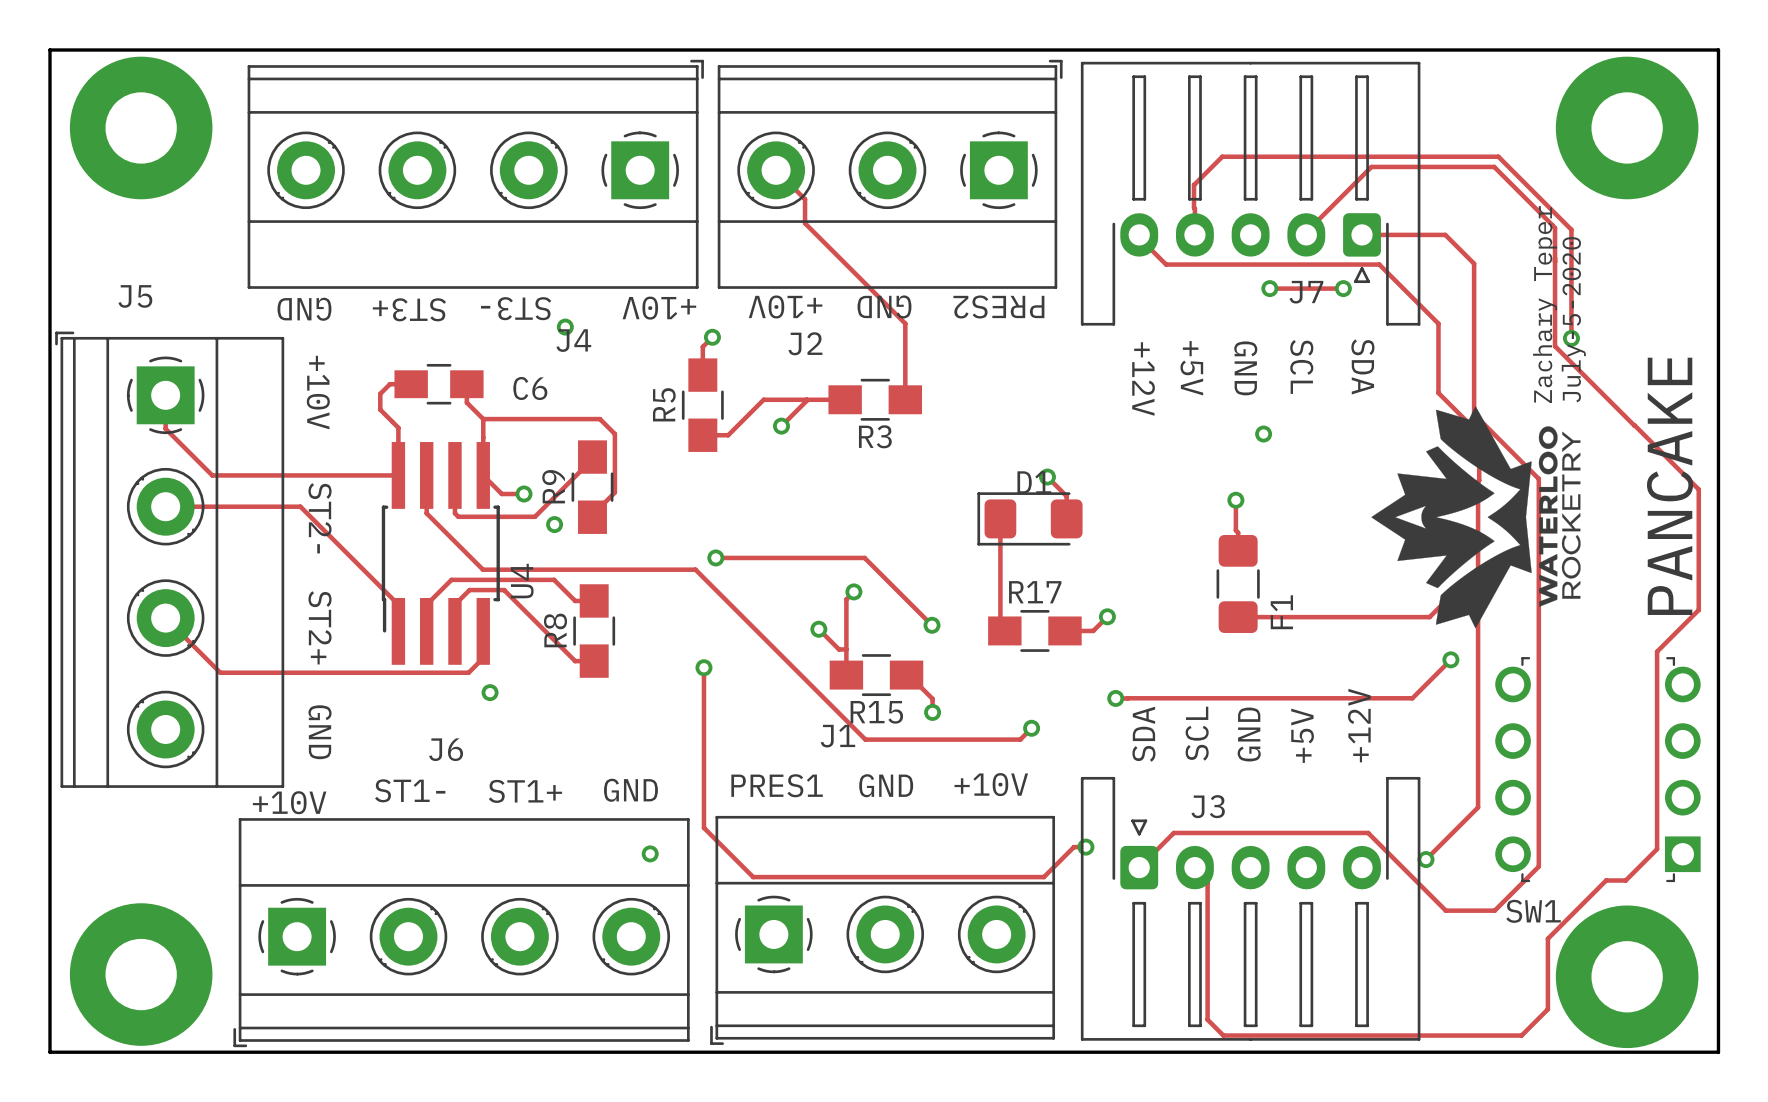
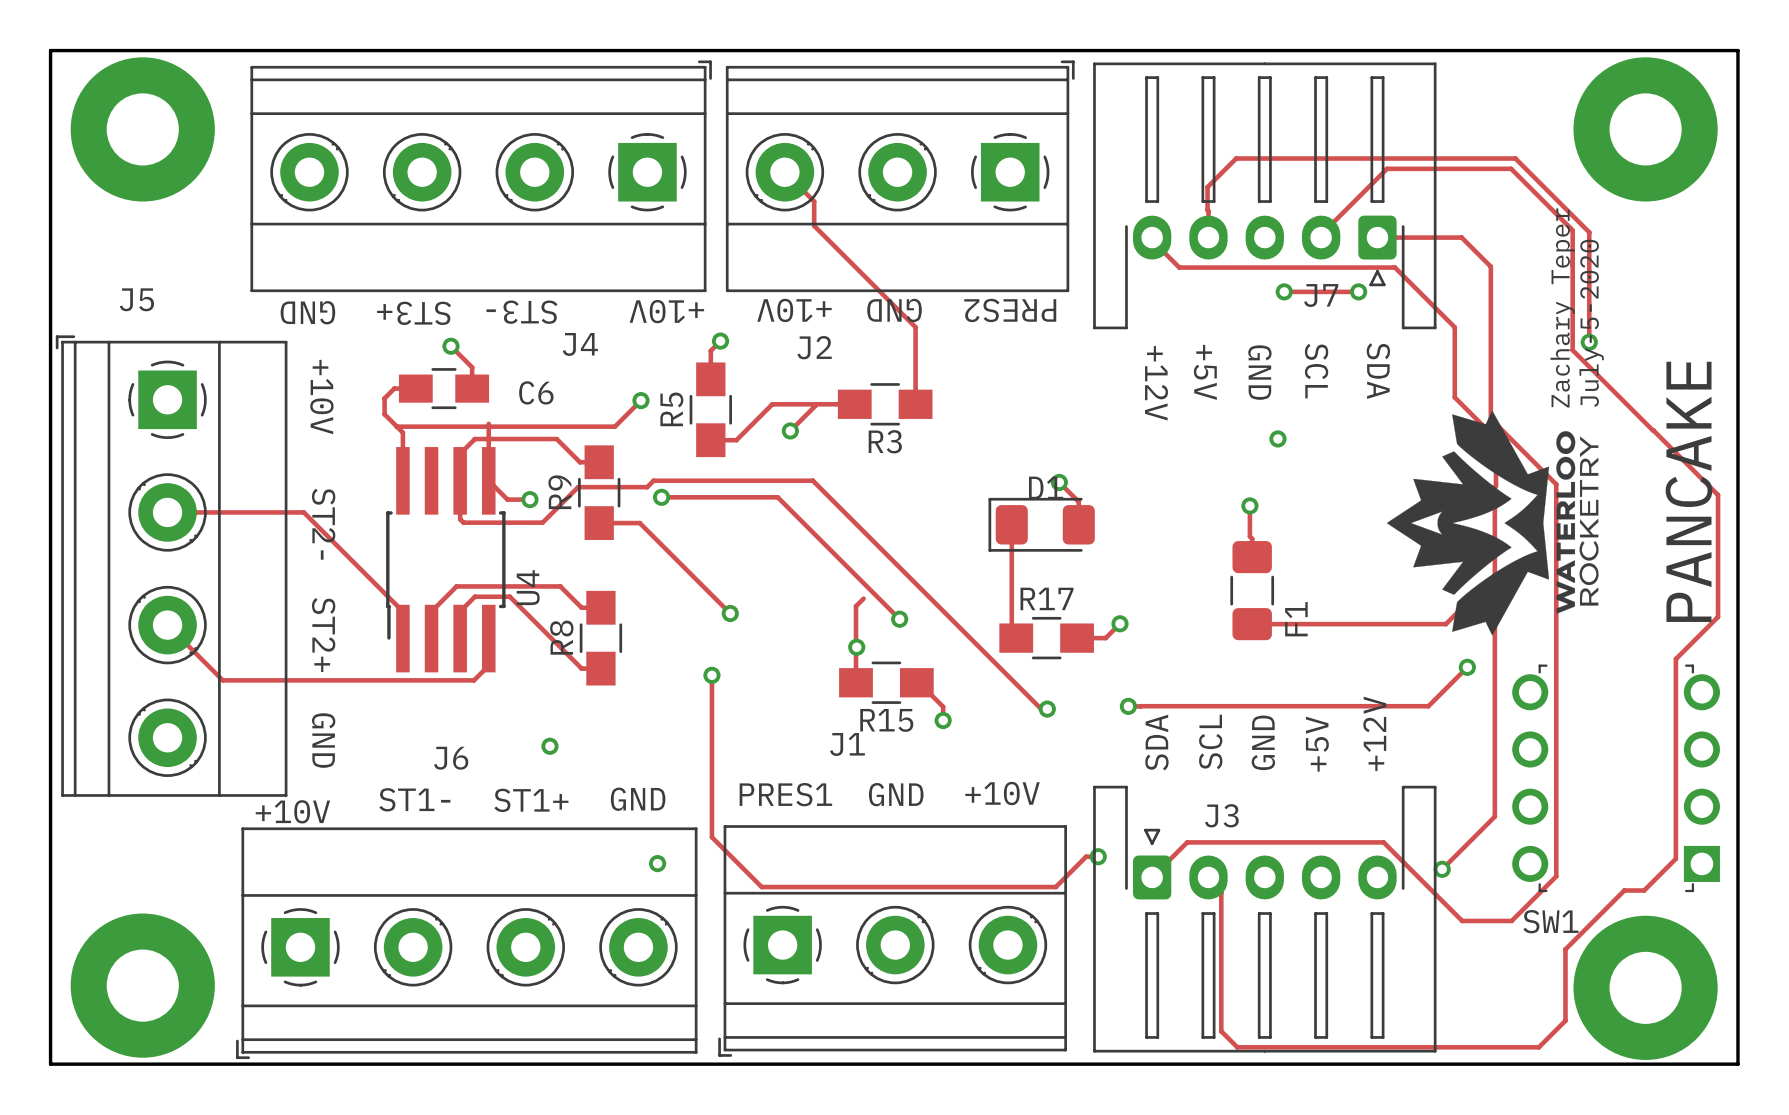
via: (565, 327) -> none
via: none -> (450, 346)
track: (466, 384) (466, 402) (483, 419) (599, 419) (614, 434) (614, 492) (592, 517) -> (472, 388) (472, 367) (450, 346)
track: (165, 395) (165, 428) (212, 475) (398, 475) -> none
track: none -> (640, 400) (614, 426) (396, 426)
via: none -> (640, 400)
track: (592, 457) (592, 459) (534, 516) -> (599, 462) (579, 462) (556, 439) (474, 439) (460, 453) (460, 480)
track: none -> (661, 497) (777, 497) (899, 619)
via: none -> (661, 497)
track: (426, 502) (426, 513) (482, 569) (695, 569) (865, 739) (1020, 739) (1031, 728) -> none
track: none -> (541, 522) (578, 487) (647, 487) (653, 480) (812, 480) (1041, 709) (1047, 709)
track: none -> (599, 523) (639, 523) (730, 613)
via: (554, 524) -> none
track: (715, 557) (864, 557) (932, 625) -> none
via: (715, 557) -> none
via: (853, 591) -> none
via: none -> (730, 613)
via: none -> (899, 619)
via: (932, 625) -> none
track: (818, 629) (839, 649) (846, 649) -> none
via: (818, 629) -> none
via: none -> (856, 647)
via position: (490, 692) -> (549, 746)
via position: (1031, 728) -> (1047, 709)

